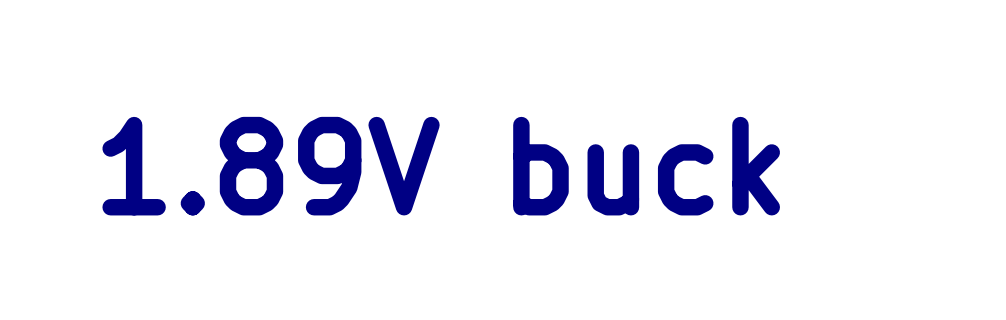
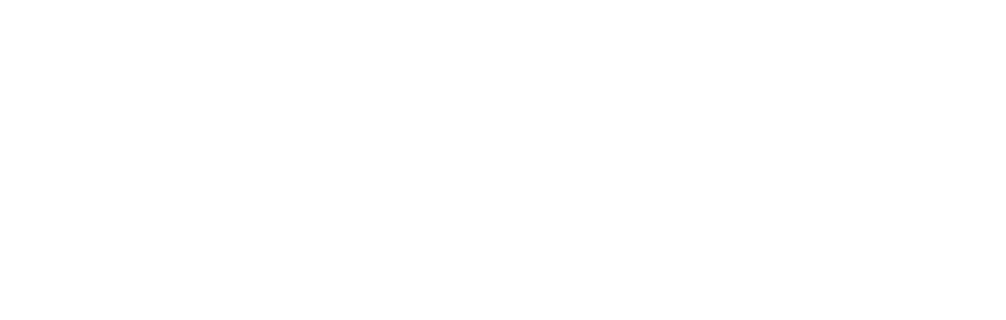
text: 1.89V buck (441, 166) -> none

